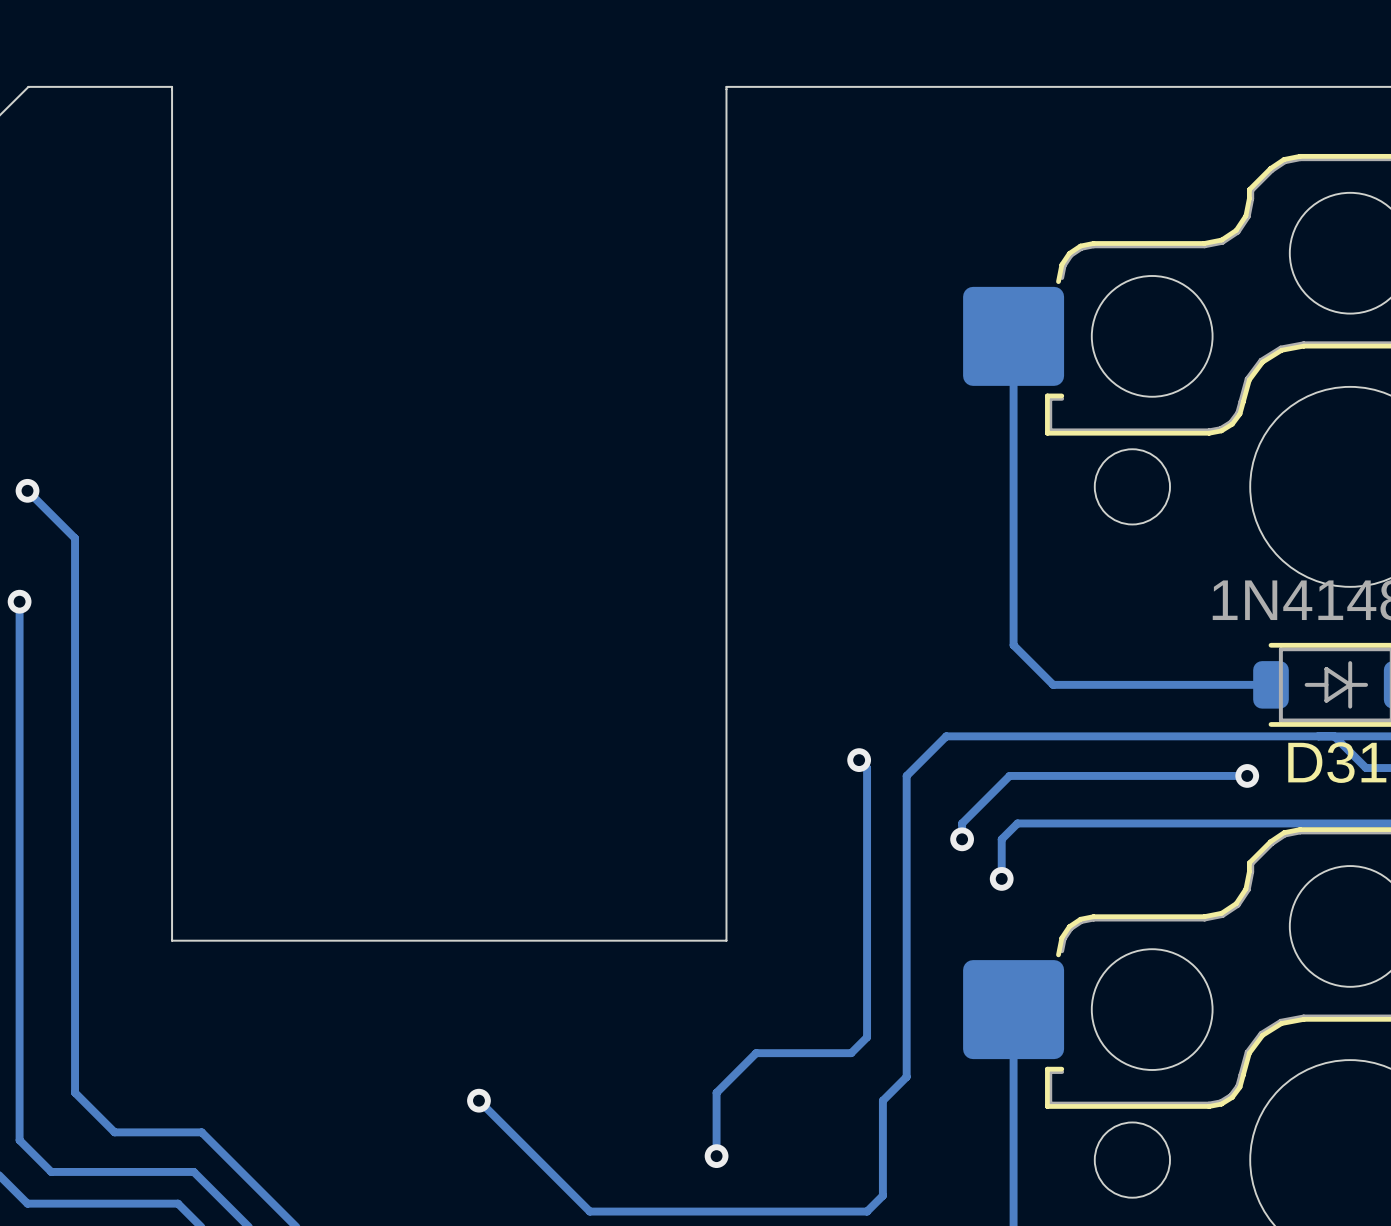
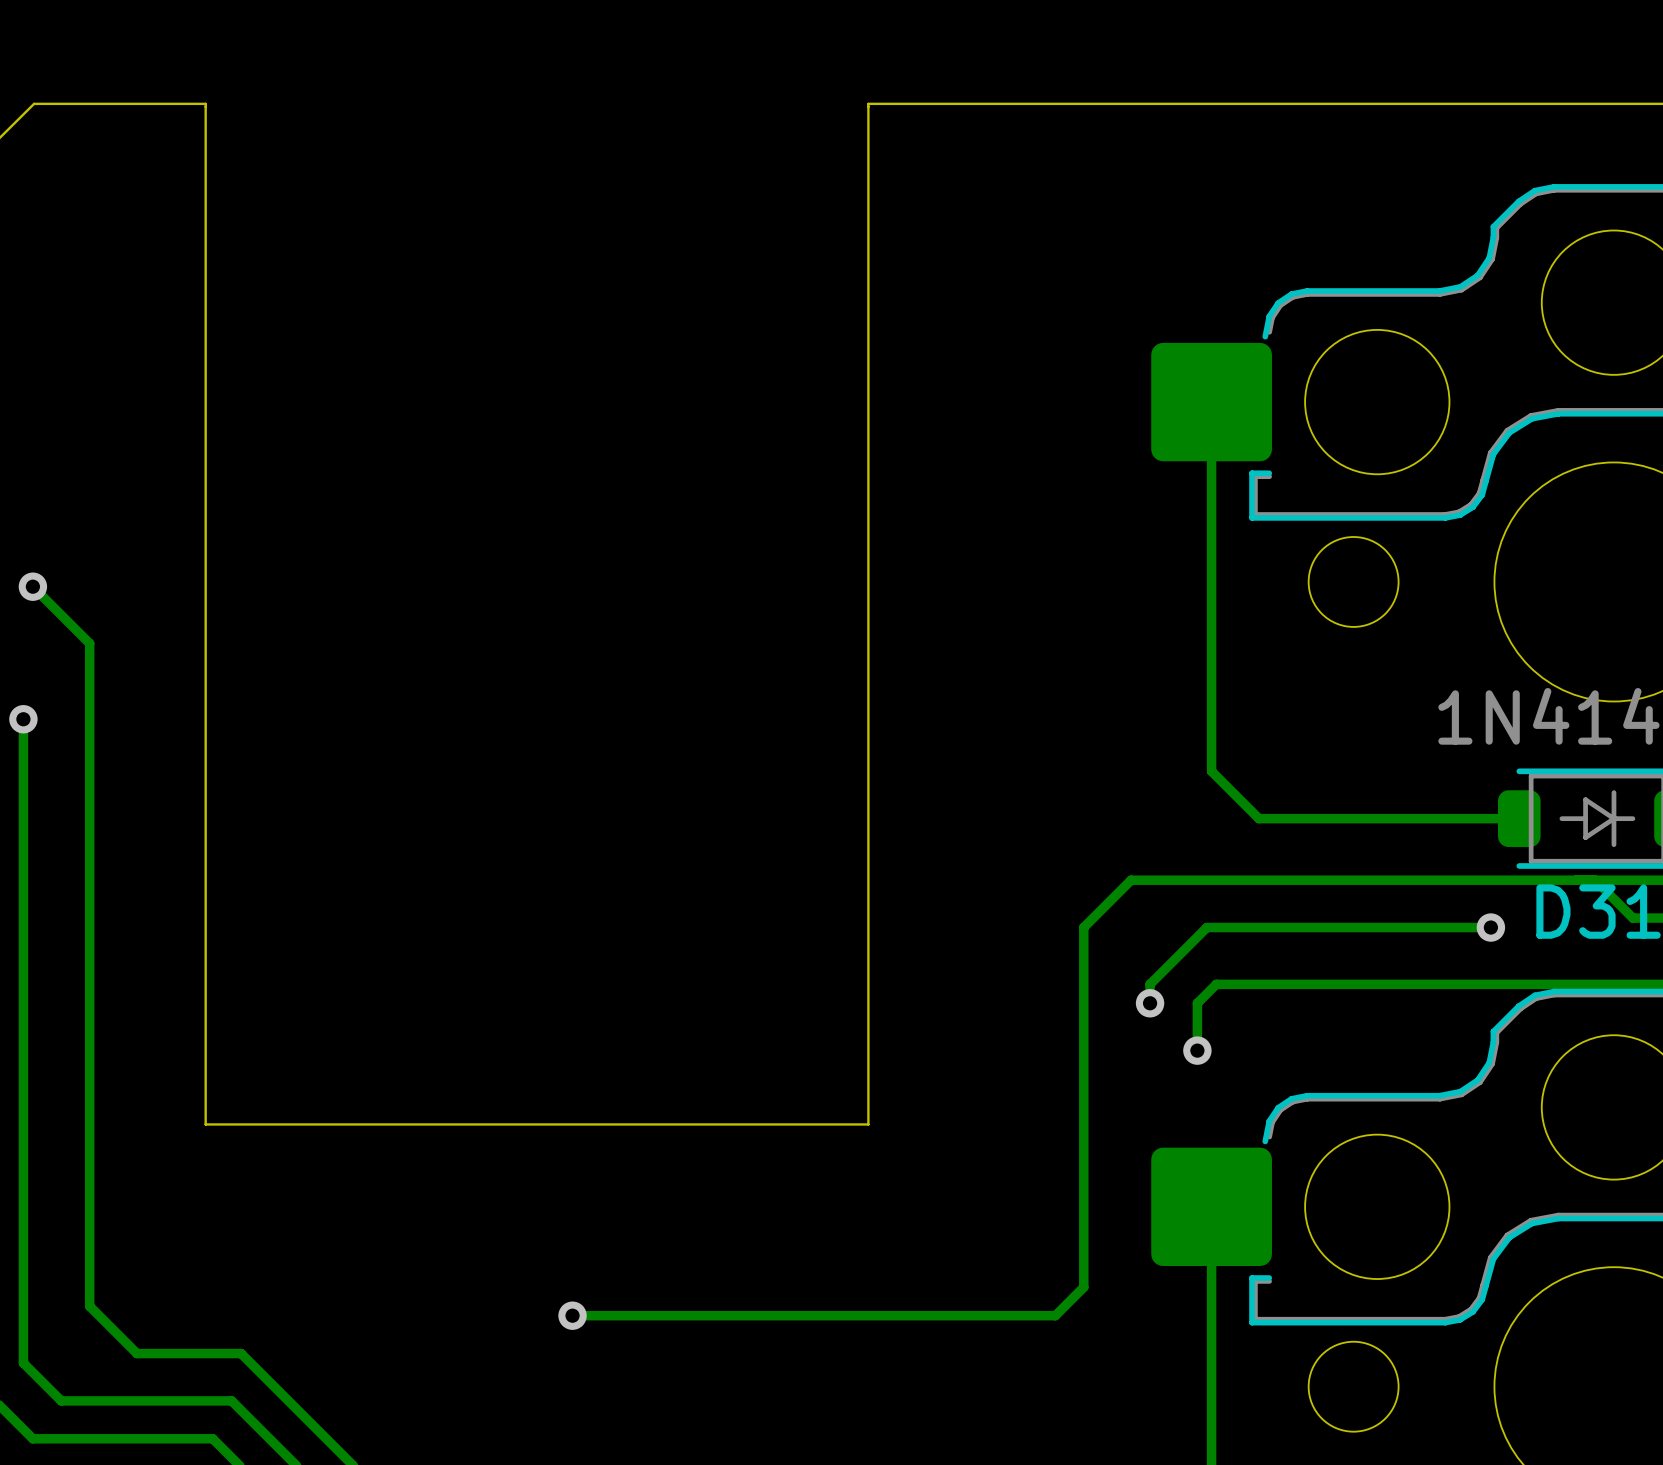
track: (859, 760) (867, 768) (867, 1037) (851, 1053) (756, 1053) (716, 1092) (716, 1156) -> none
via: (859, 760) -> none
track: (882, 1100) (882, 1195) (867, 1211) (589, 1211) (478, 1100) -> (1055, 1315) (572, 1315)
via: (716, 1156) -> none

